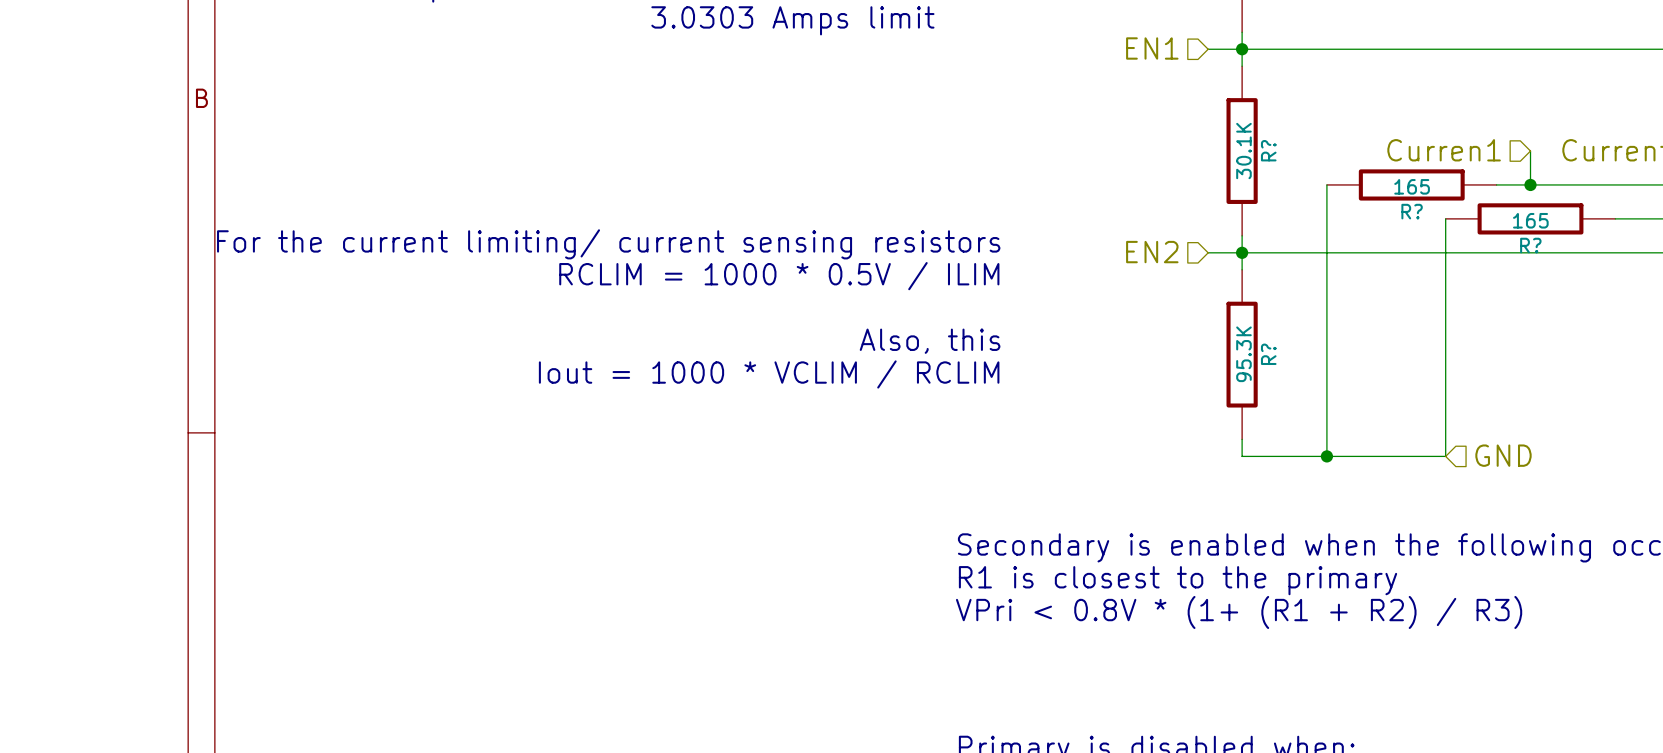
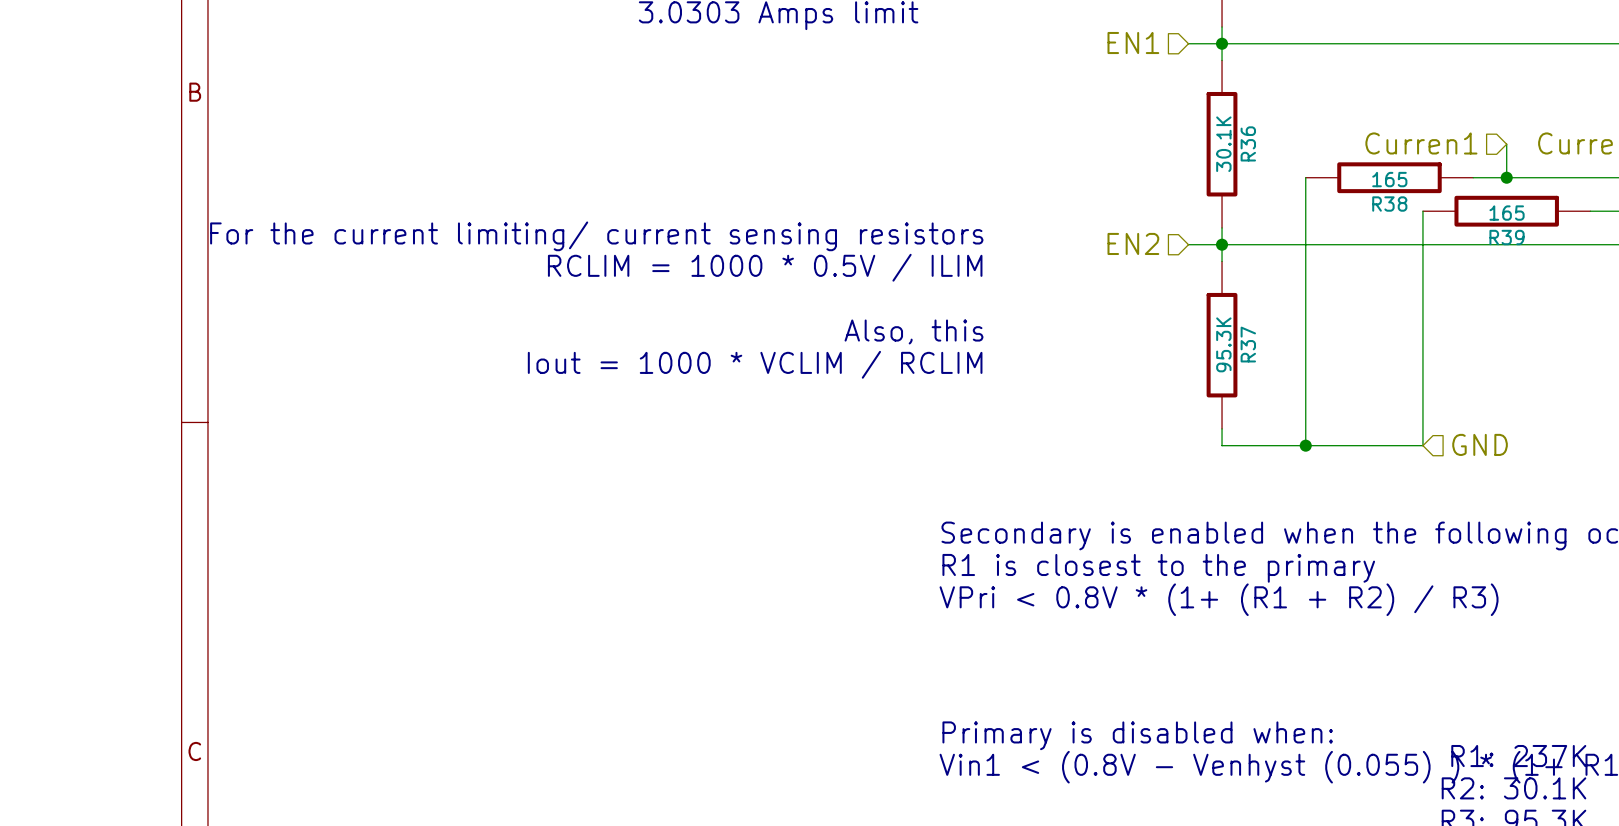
R? name: R? (1268, 150) -> R36 (1248, 143)
R? name: R? (1412, 211) -> R38 (1389, 204)
R? name: R? (1530, 245) -> R39 (1507, 237)
R? name: R? (1268, 354) -> R37 (1248, 344)

